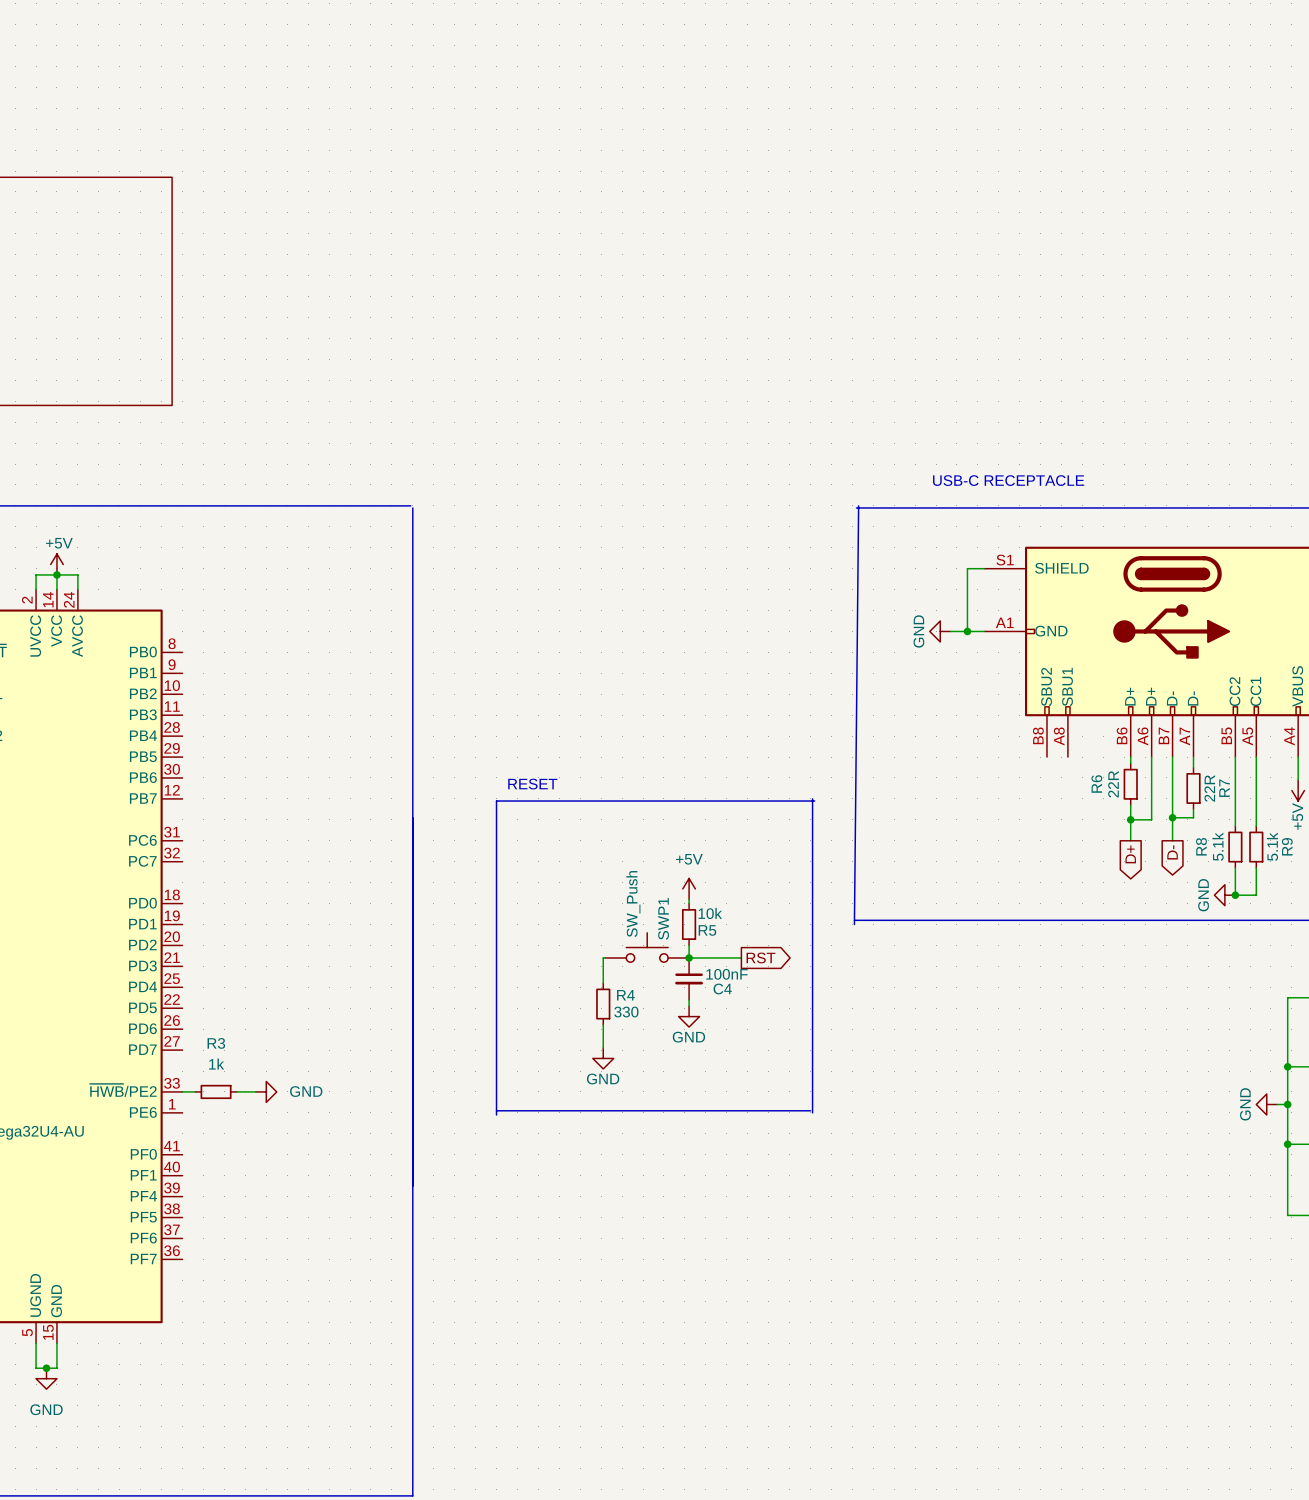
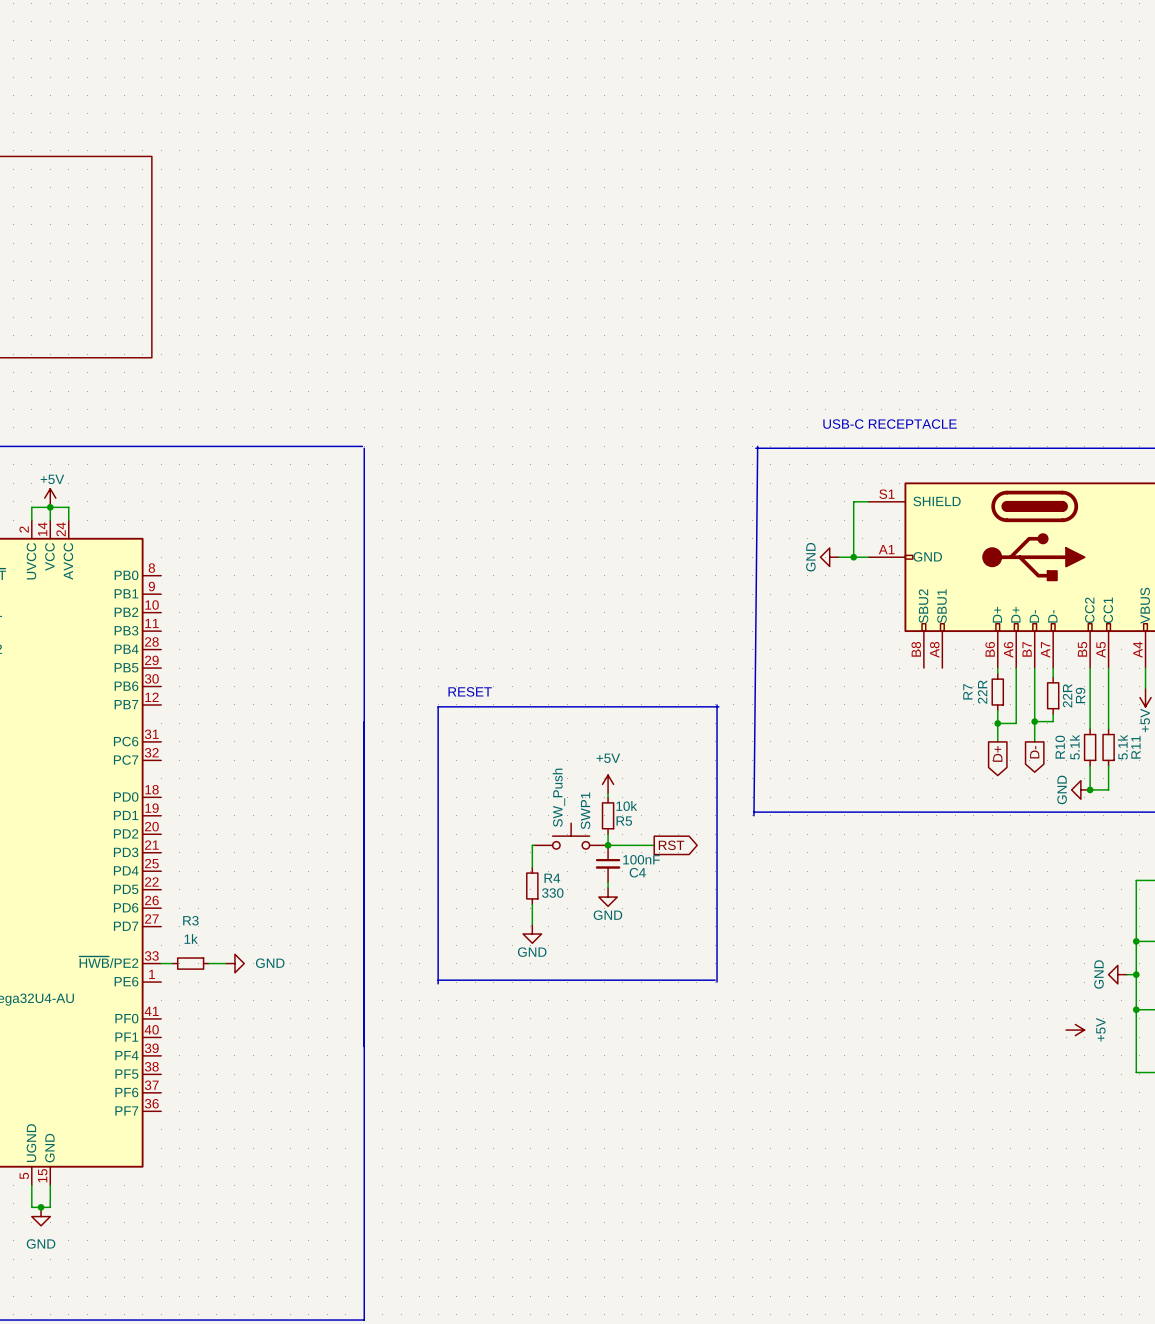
R6 name: R6 (1096, 783) -> R7 (967, 691)
R7 name: R7 (1224, 788) -> R9 (1080, 695)
R8 name: R8 (1201, 846) -> R10 (1060, 747)
R9 name: R9 (1287, 846) -> R11 (1135, 747)
power symbol: none -> +5V (1075, 1030)

